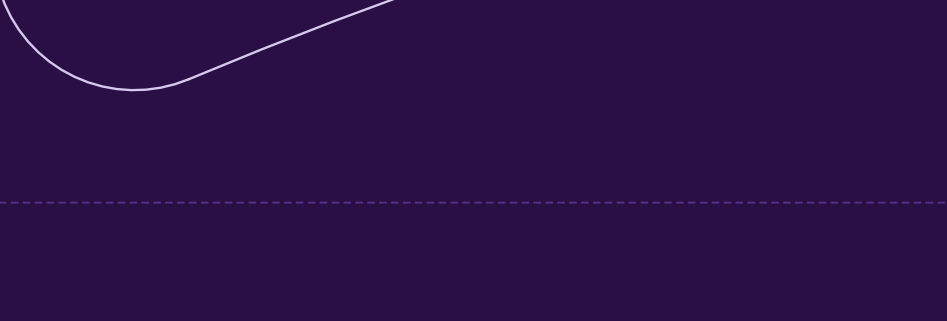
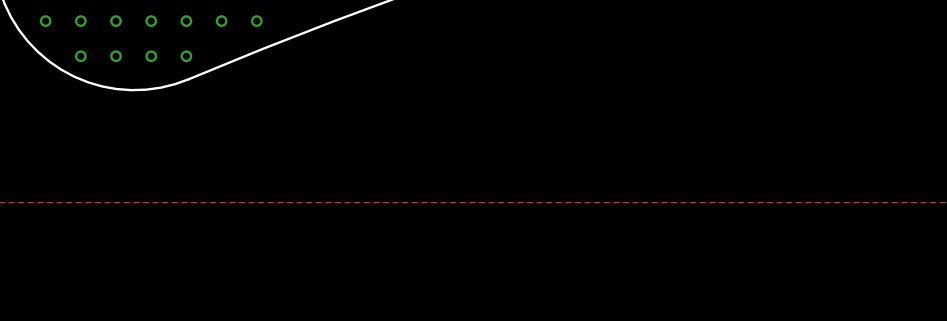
via: none -> (45, 21)
via: none -> (80, 21)
via: none -> (116, 21)
via: none -> (151, 21)
via: none -> (186, 21)
via: none -> (221, 21)
via: none -> (256, 21)
via: none -> (80, 56)
via: none -> (116, 56)
via: none -> (151, 56)
via: none -> (186, 56)

